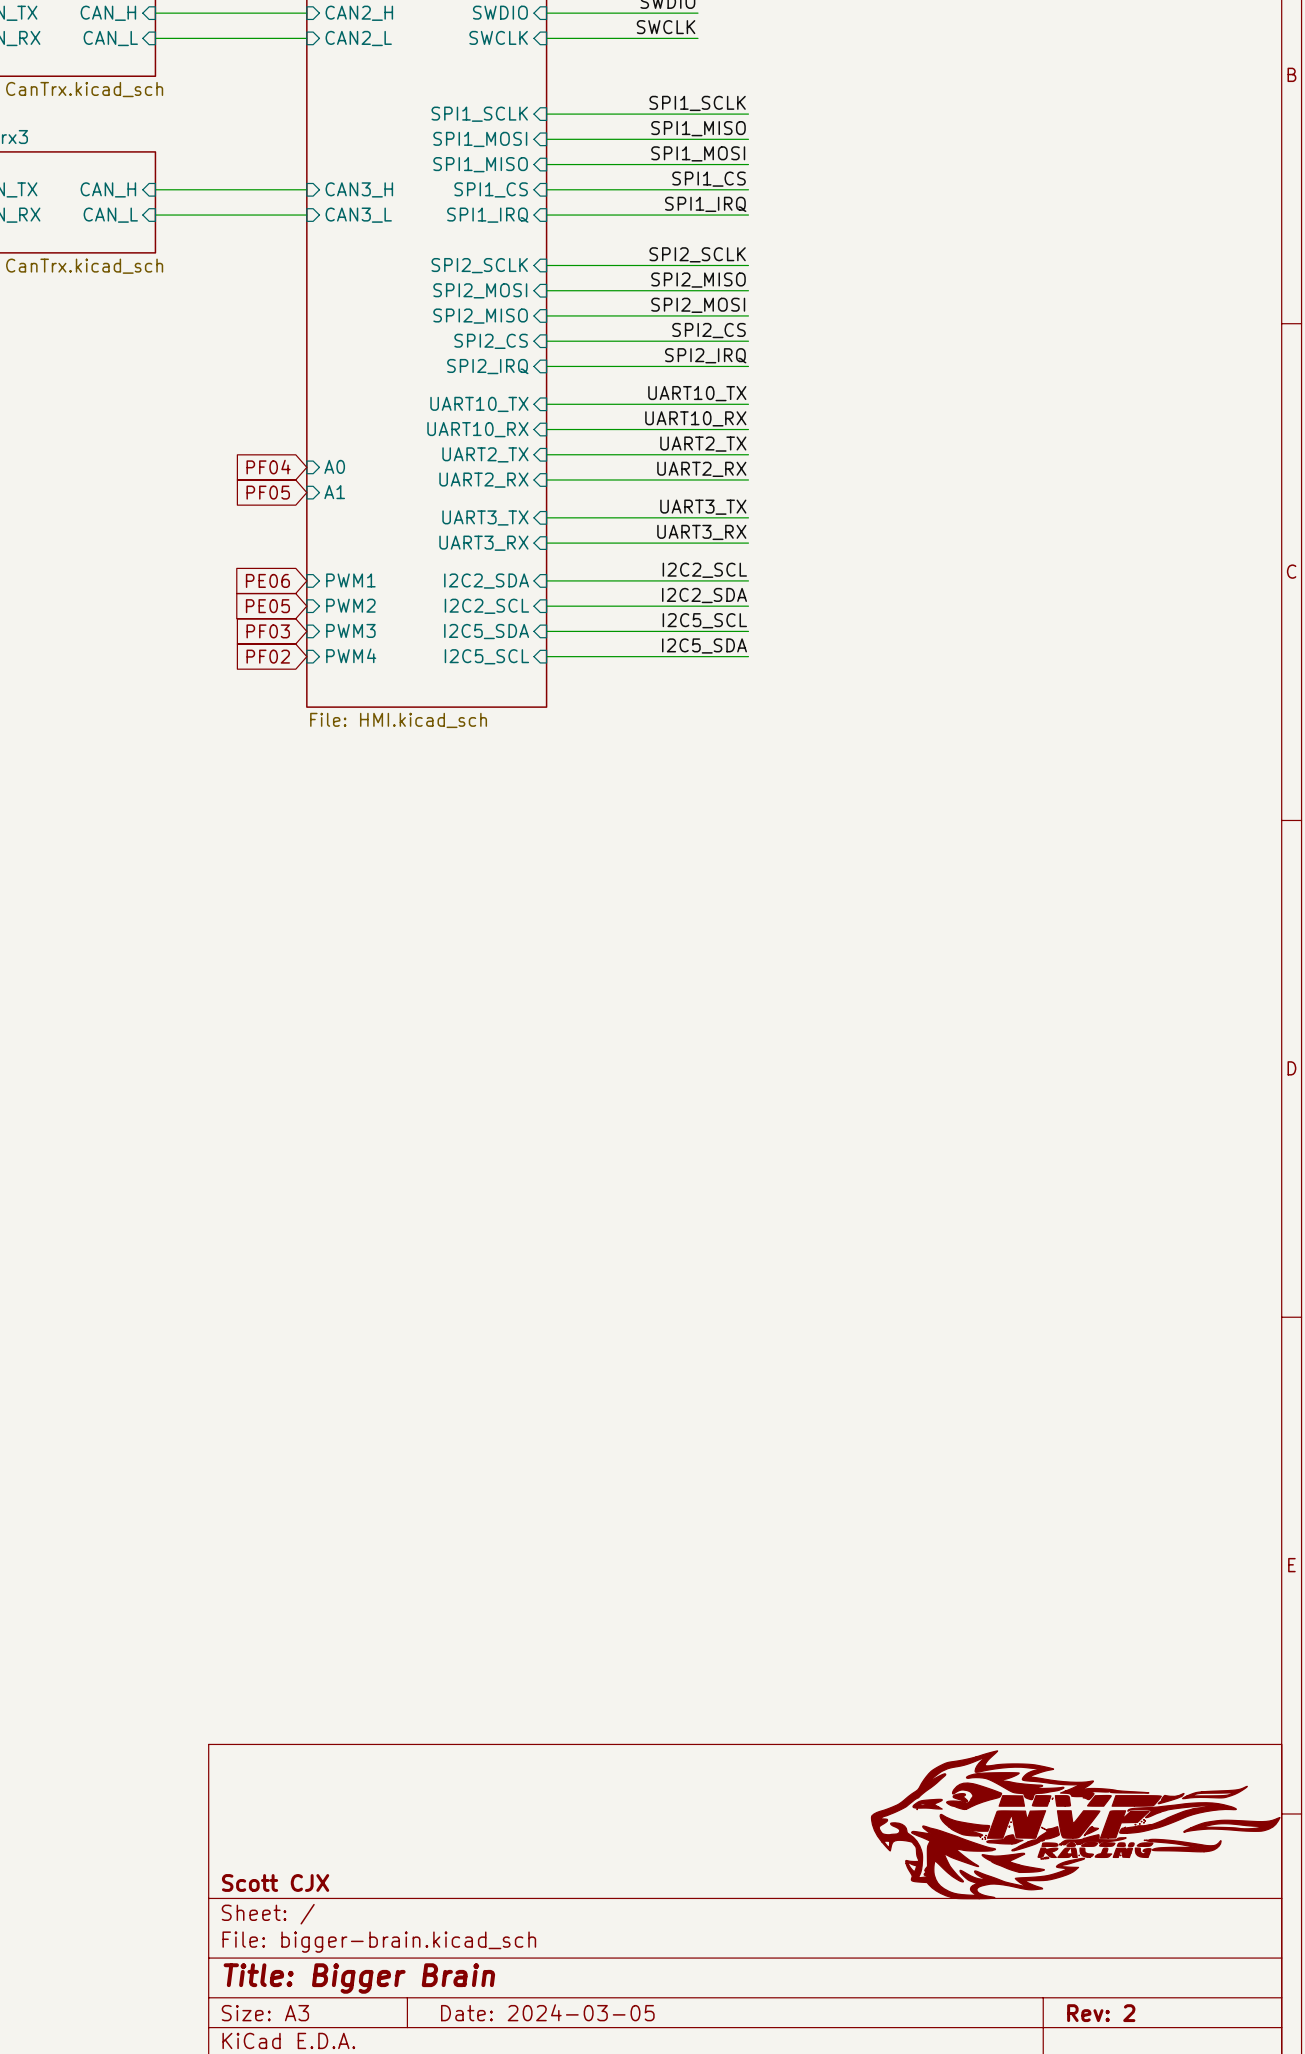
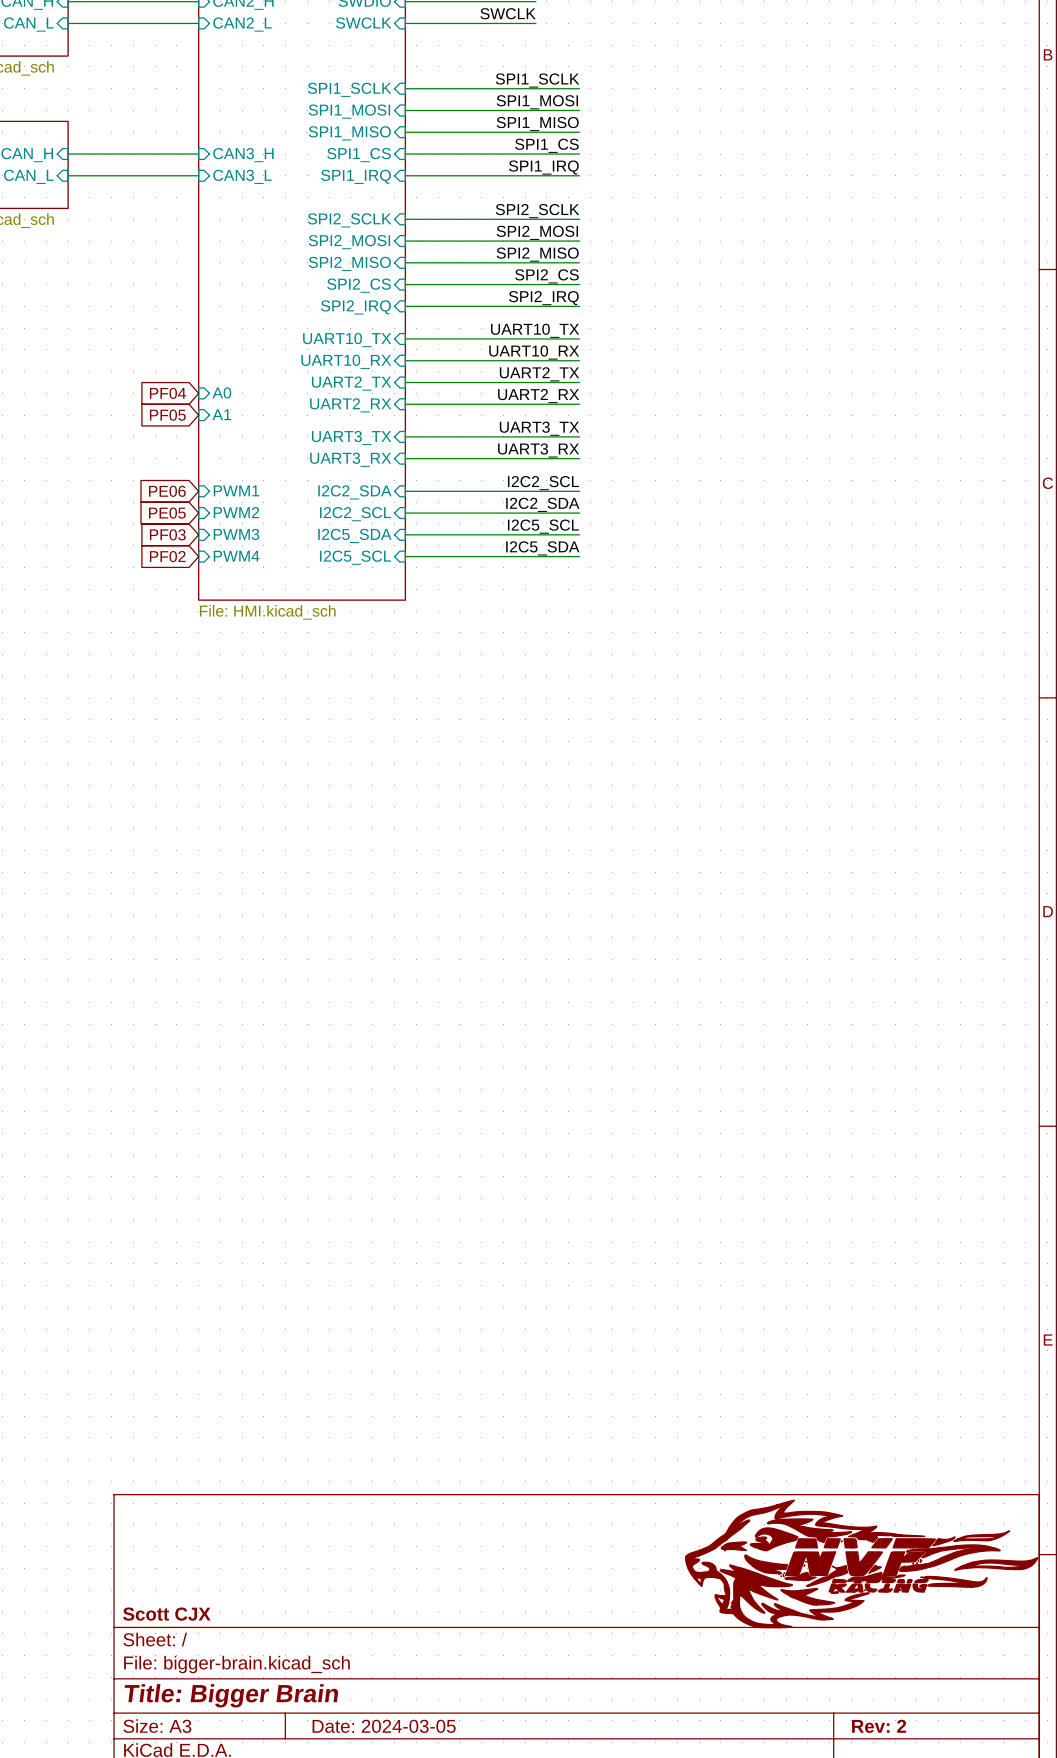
label: SPI1_MISO (698, 128) -> SPI1_MOSI (537, 102)
label: SPI1_MOSI (698, 153) -> SPI1_MISO (537, 124)
label: SPI2_MISO (698, 280) -> SPI2_MOSI (537, 232)
label: SPI2_MOSI (698, 305) -> SPI2_MISO (537, 254)

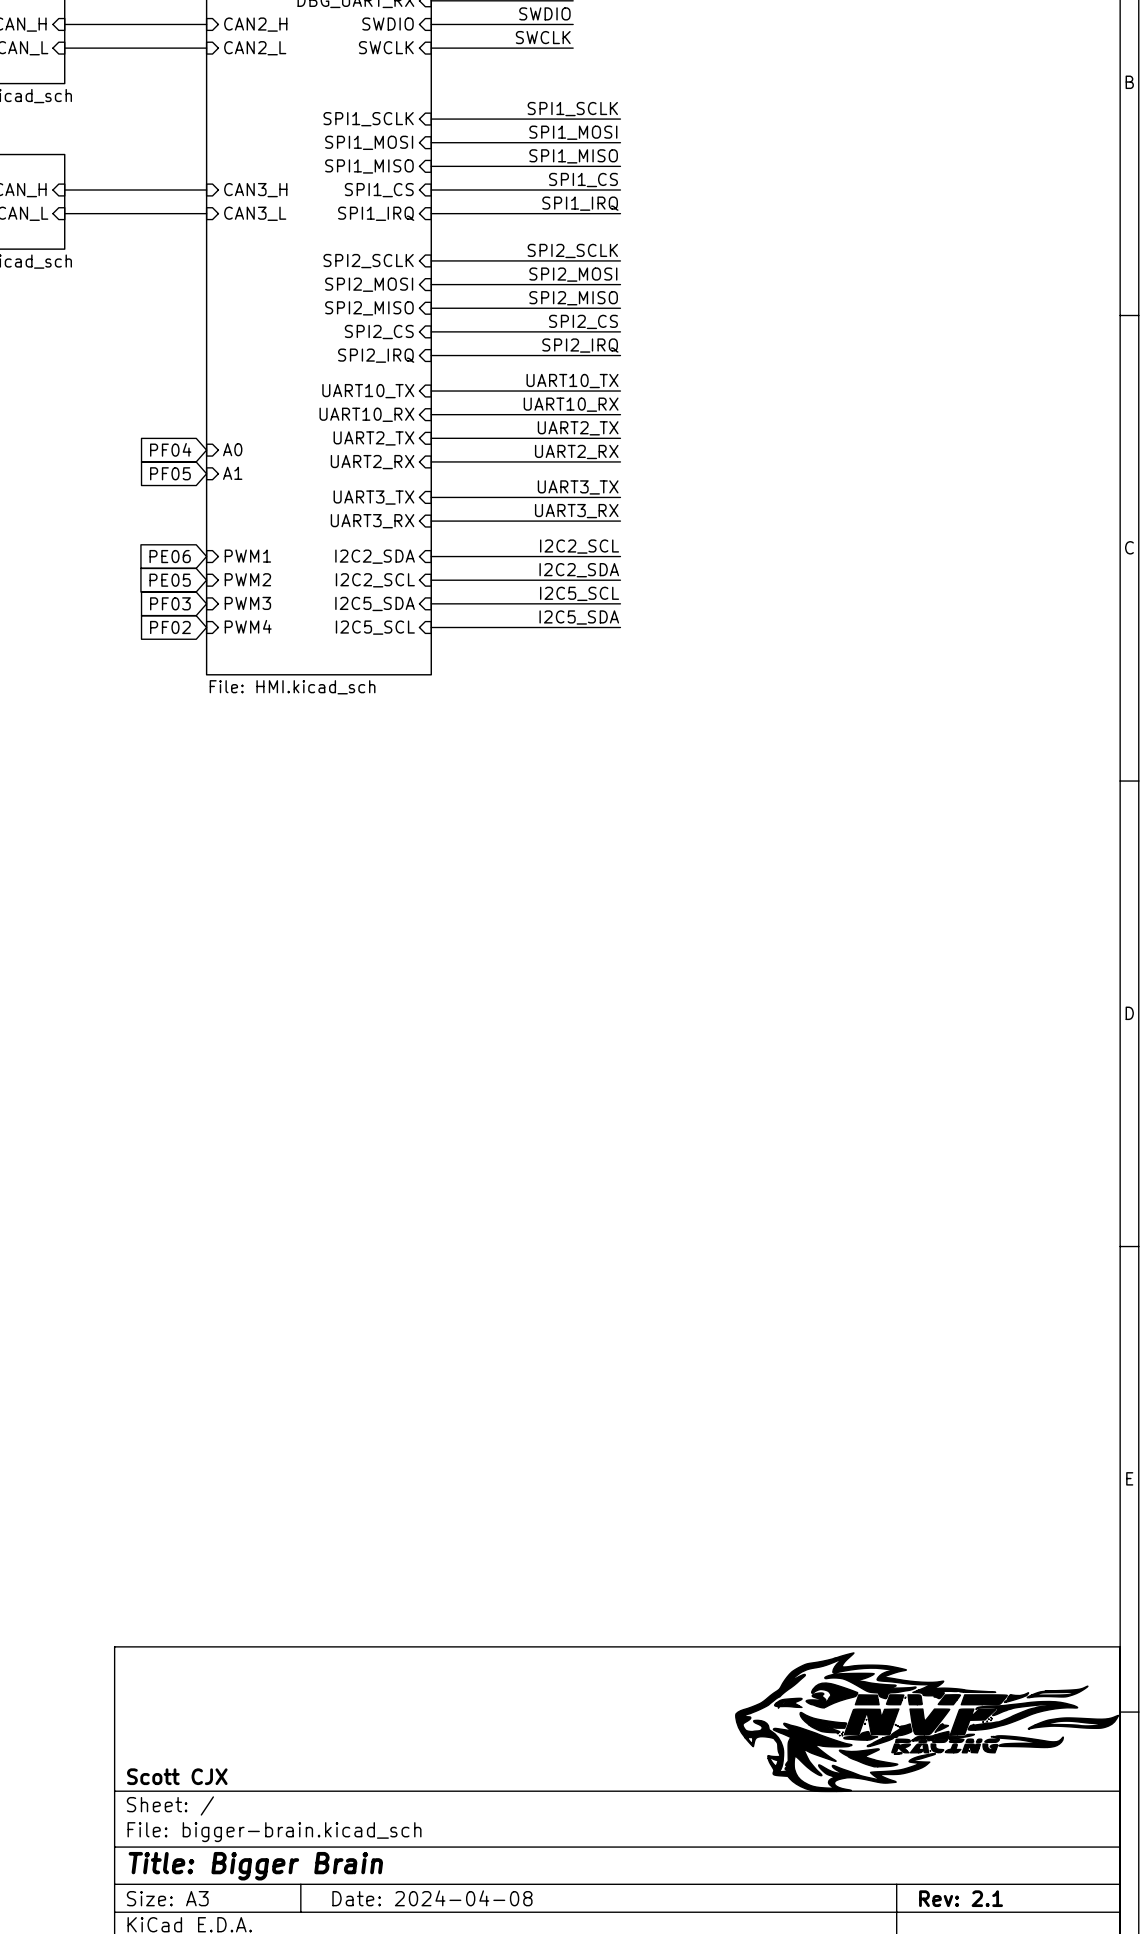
title block: Date: 2024-03-05 (384, 1726) -> Date: 2024-04-08 (432, 1898)
title block: Rev: 2 (879, 1726) -> Rev: 2.1 (961, 1898)

